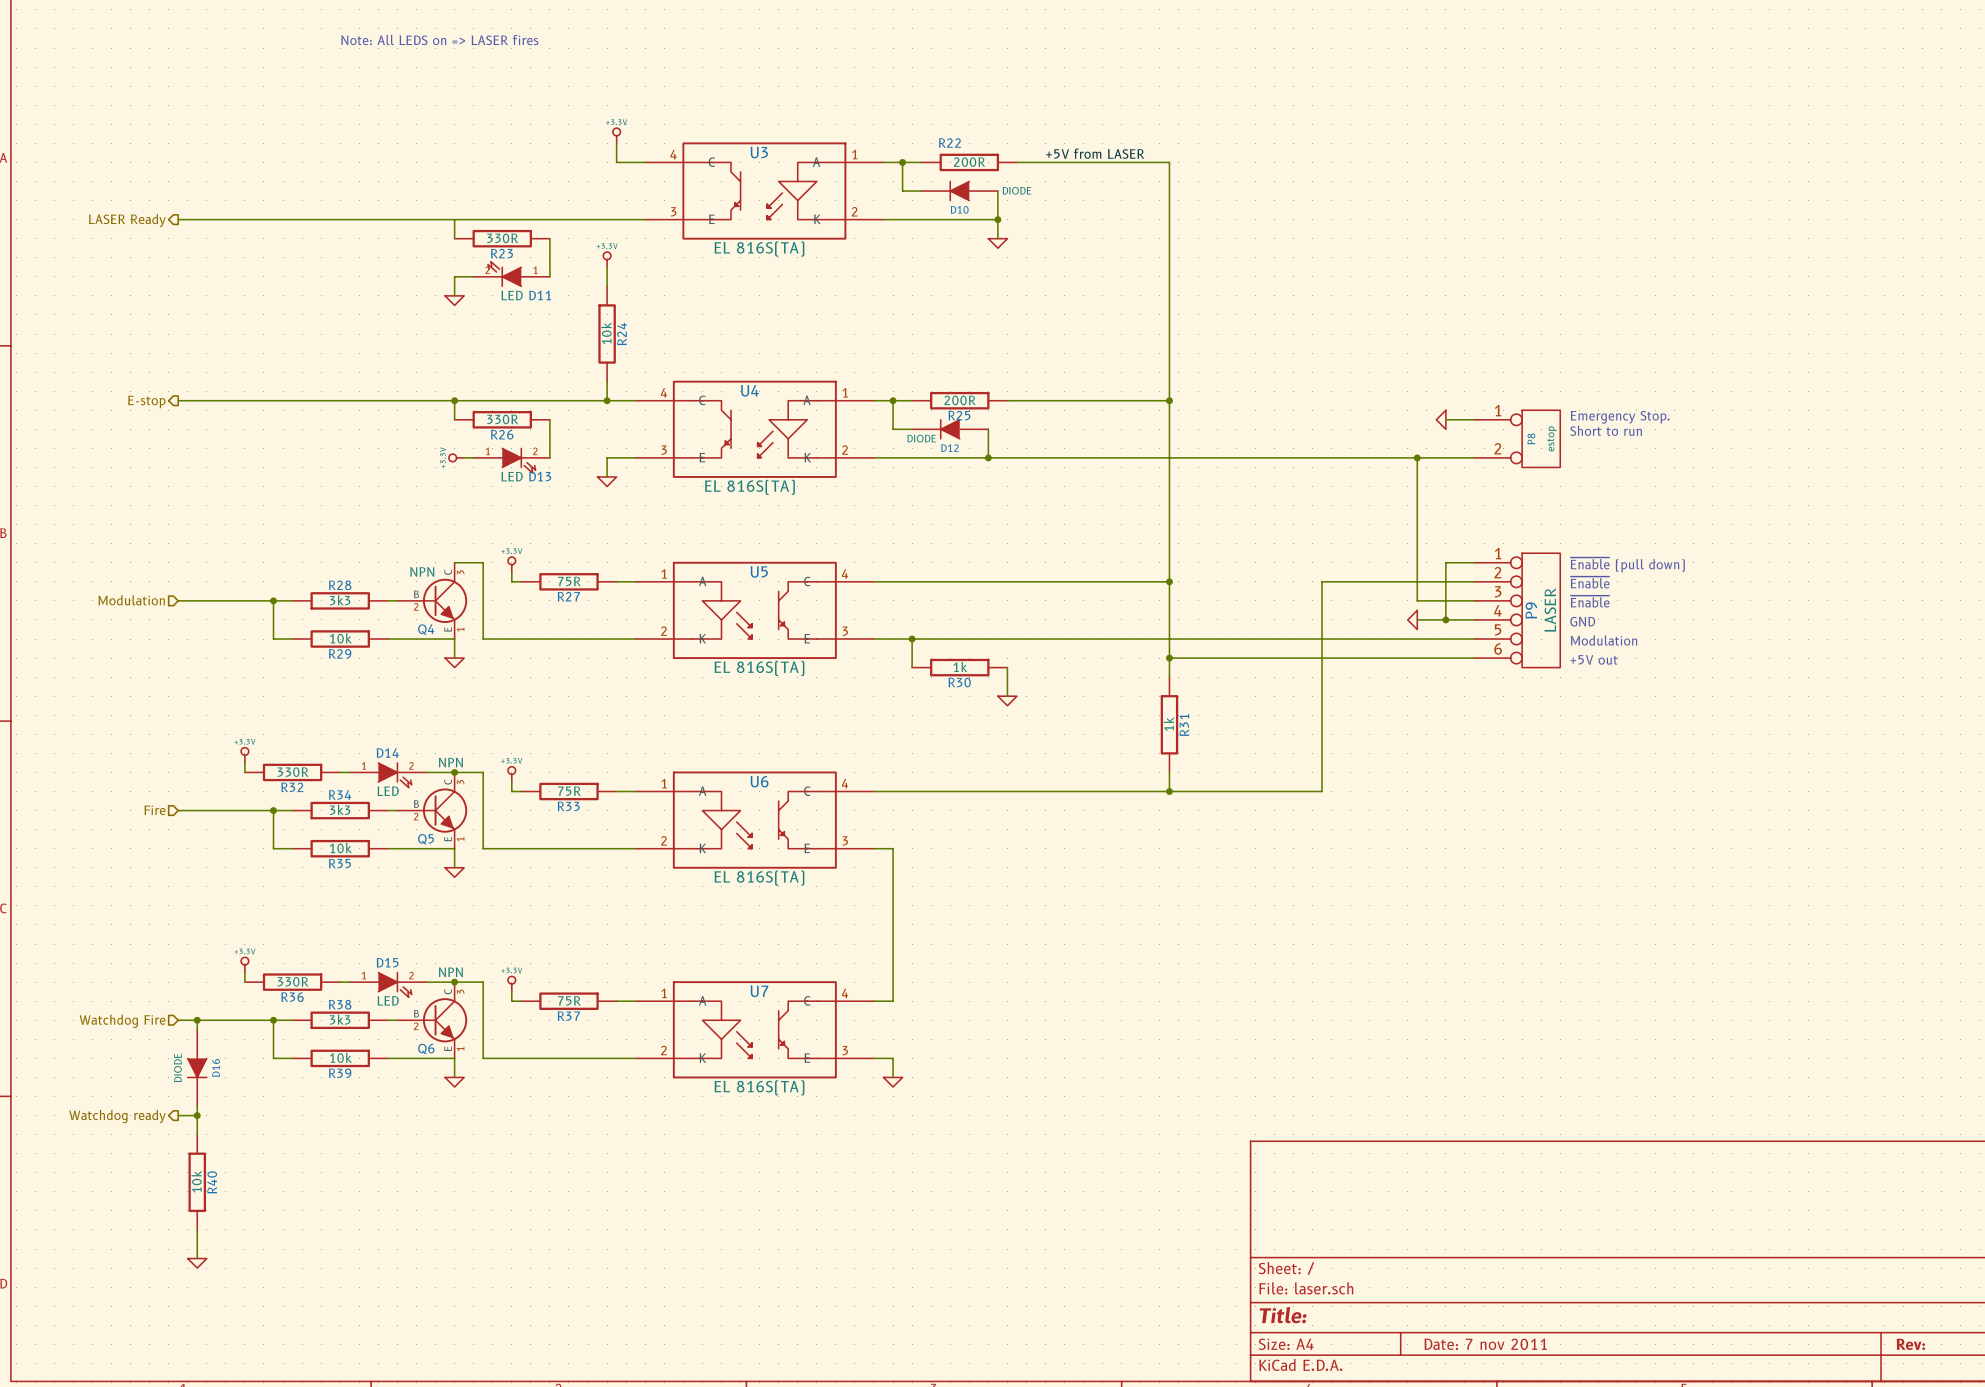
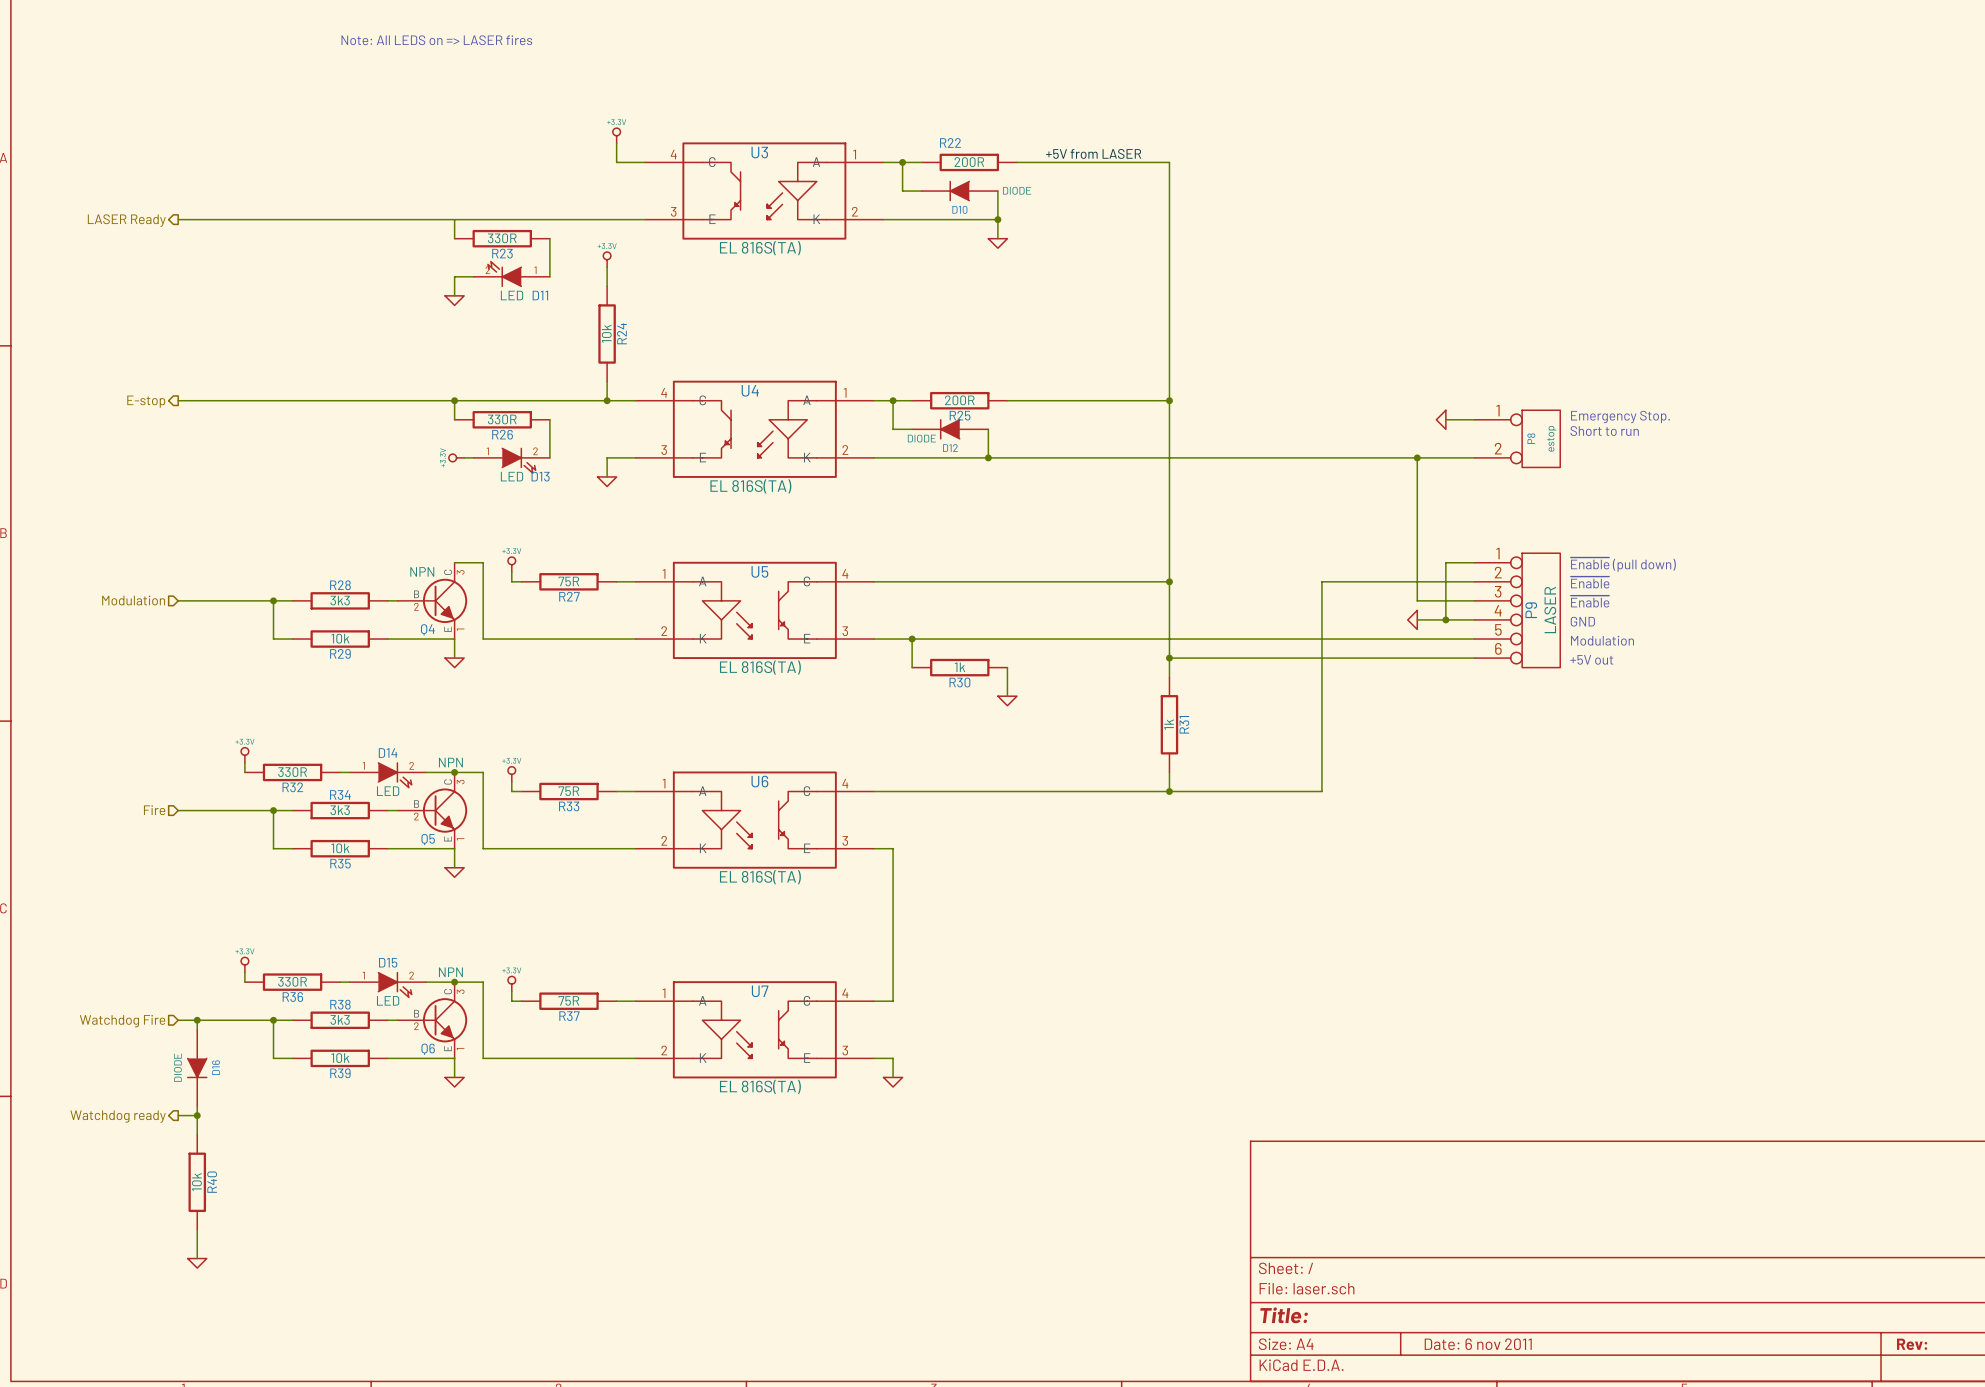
title block: Date: 7 nov 2011 (1485, 1344) -> Date: 6 nov 2011 (1478, 1344)

